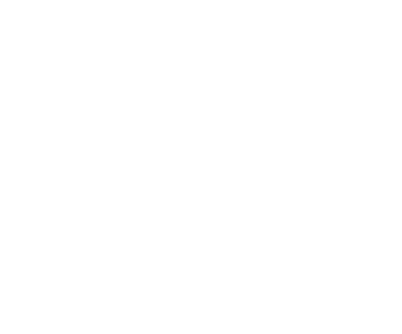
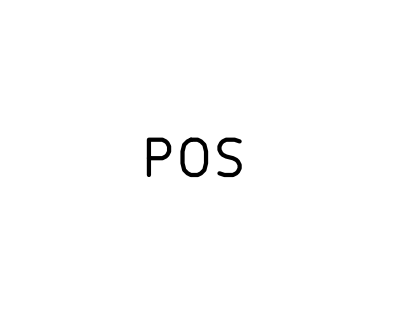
label: none -> POS (194, 157)

